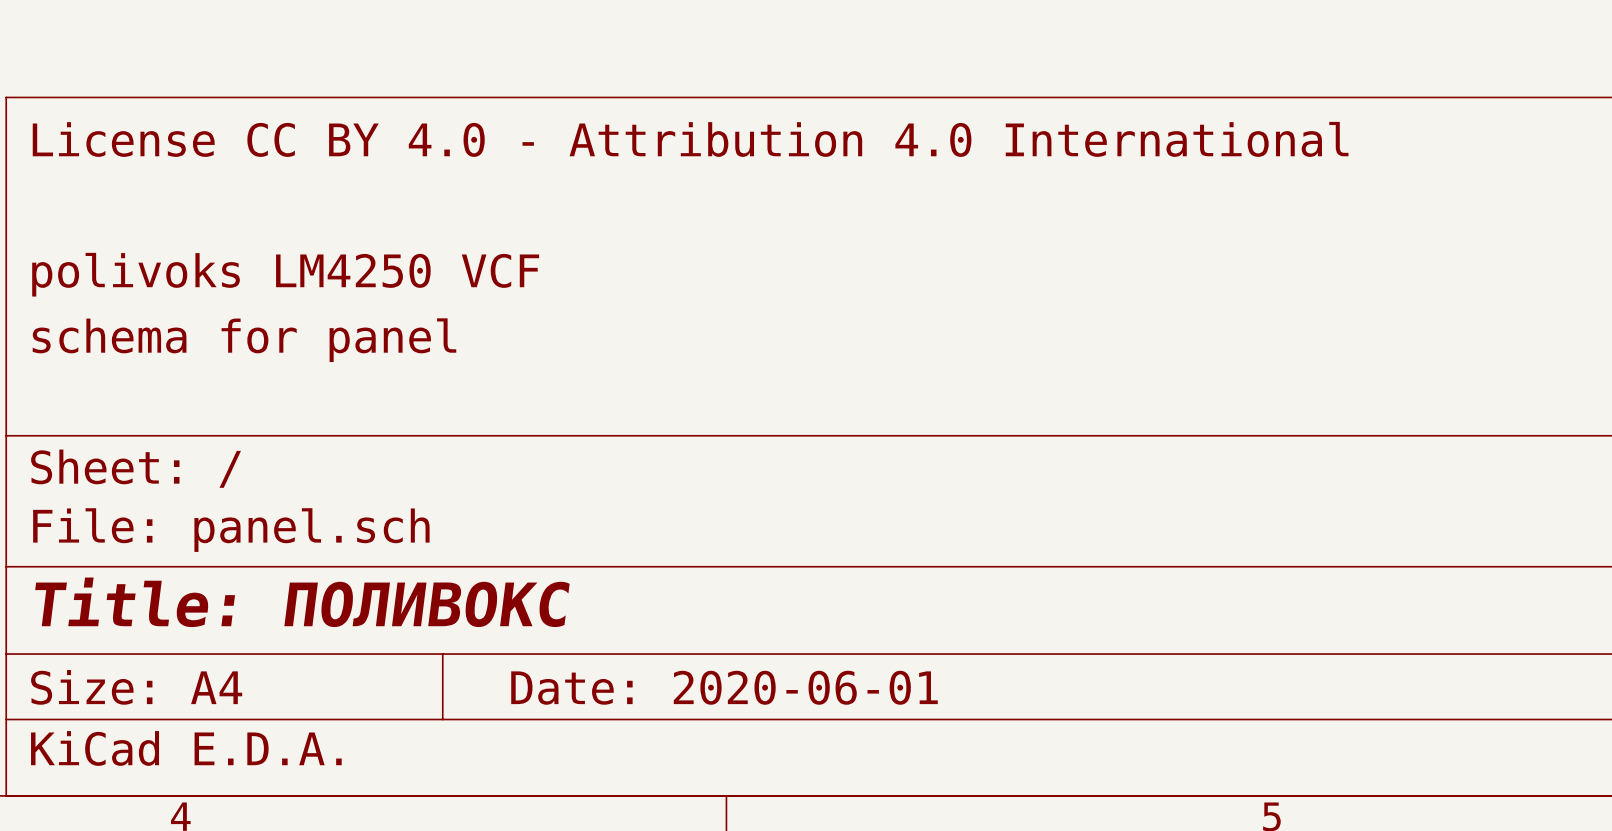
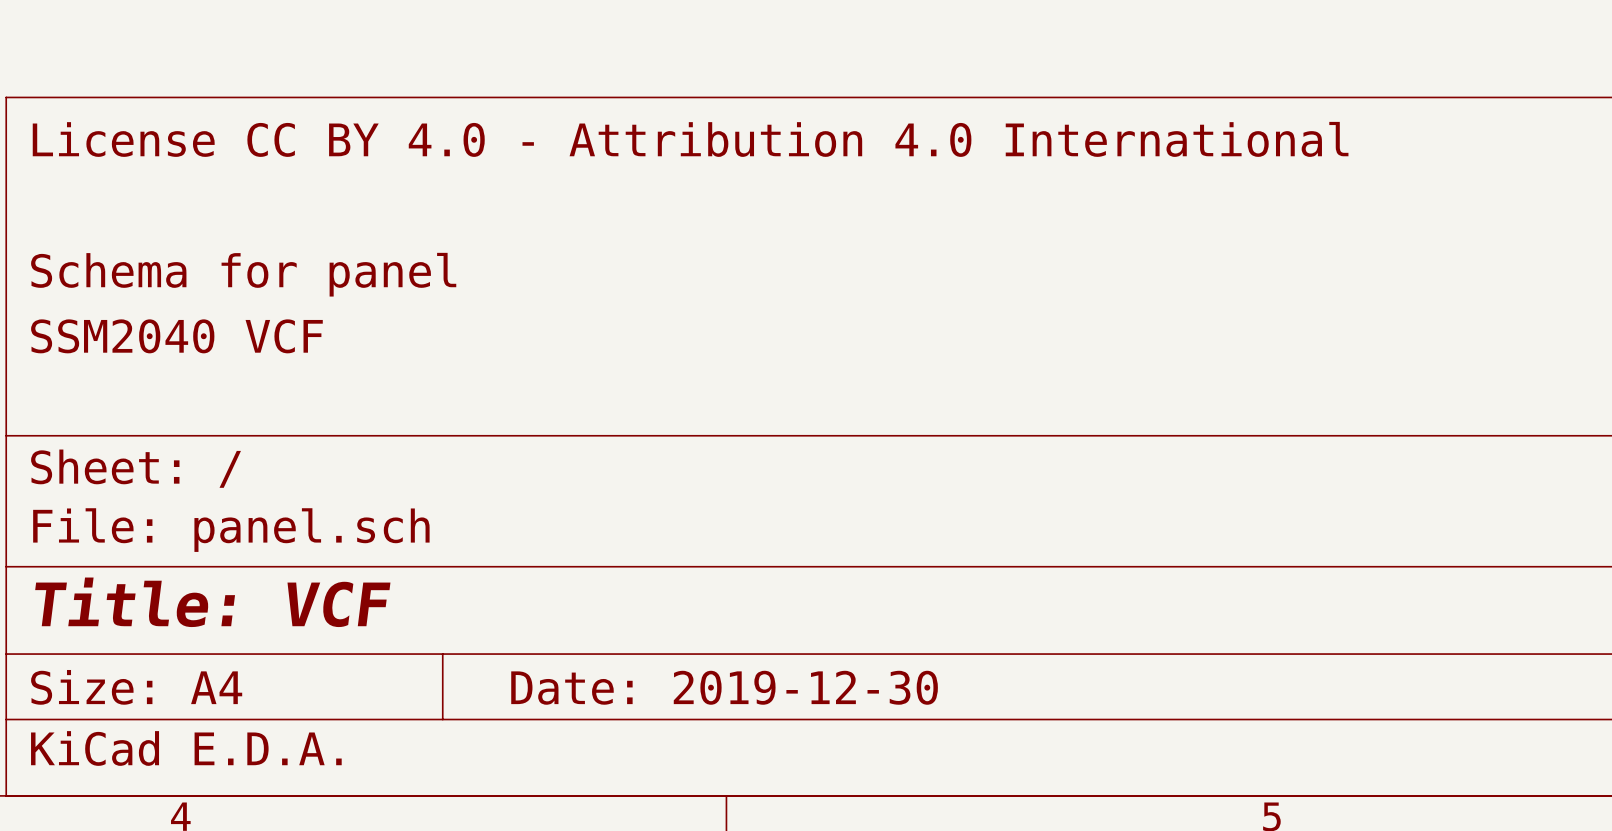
title block: polivoks LM4250 VCF (285, 274) -> Schema for panel (243, 274)
title block: schema for panel (244, 340) -> SSM2040 VCF (176, 336)
title block: Title: ПОЛИВОКС (302, 602) -> Title: VCF (212, 602)
title block: Date: 2020-06-01 (724, 687) -> Date: 2019-12-30 (724, 687)

